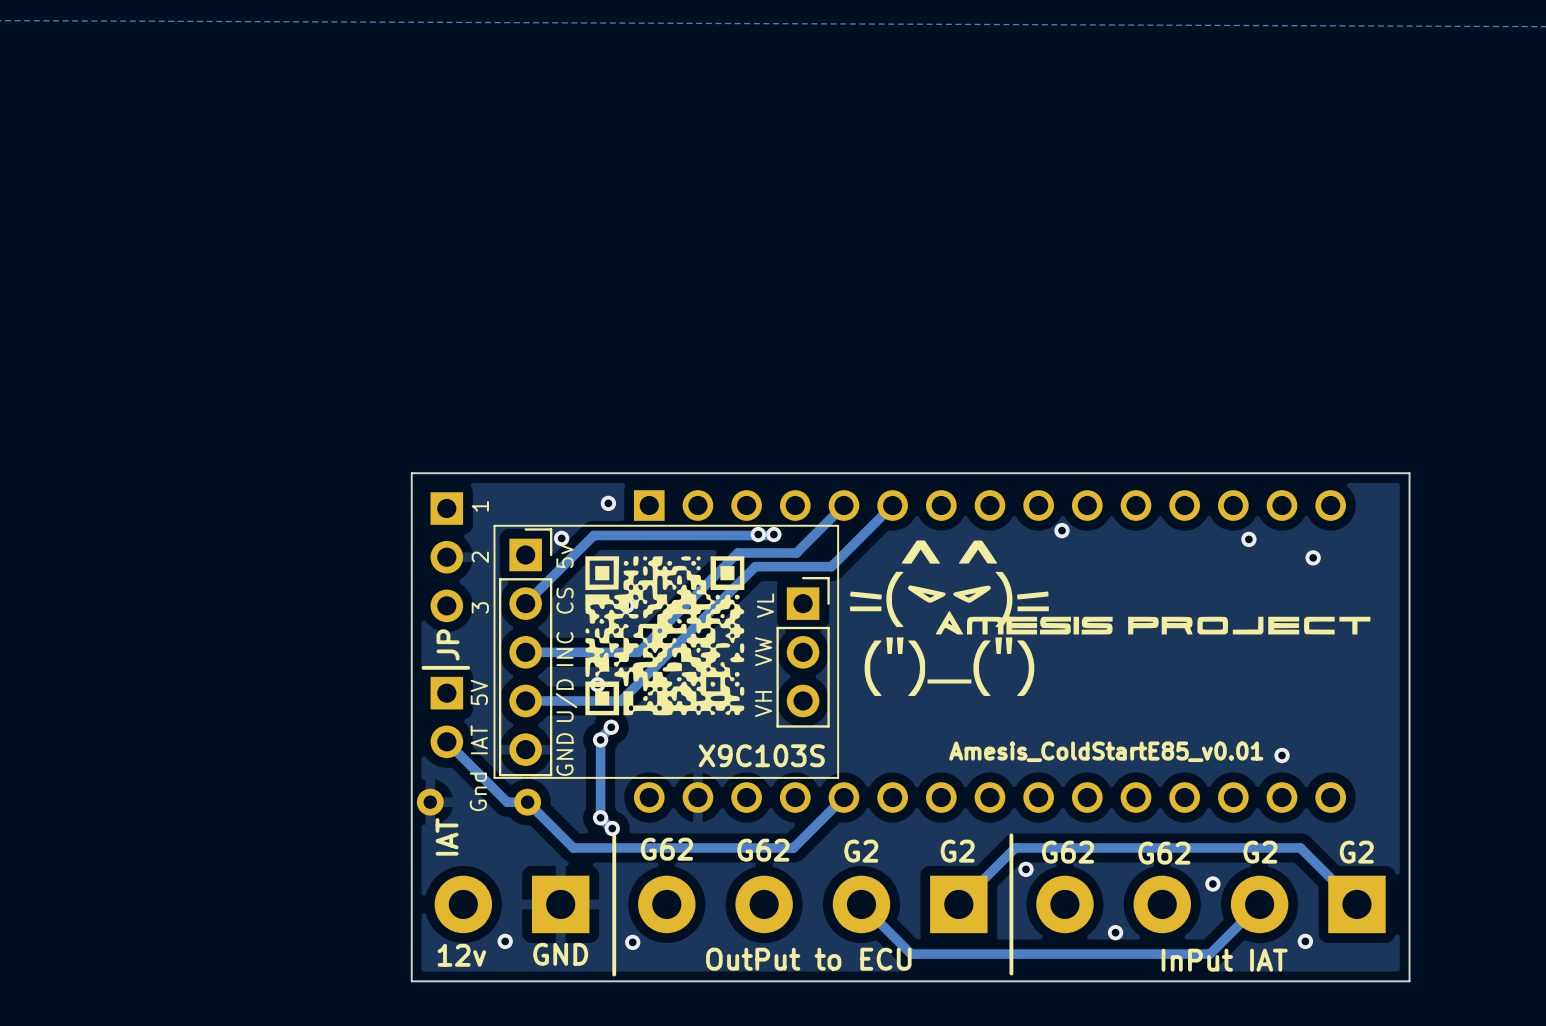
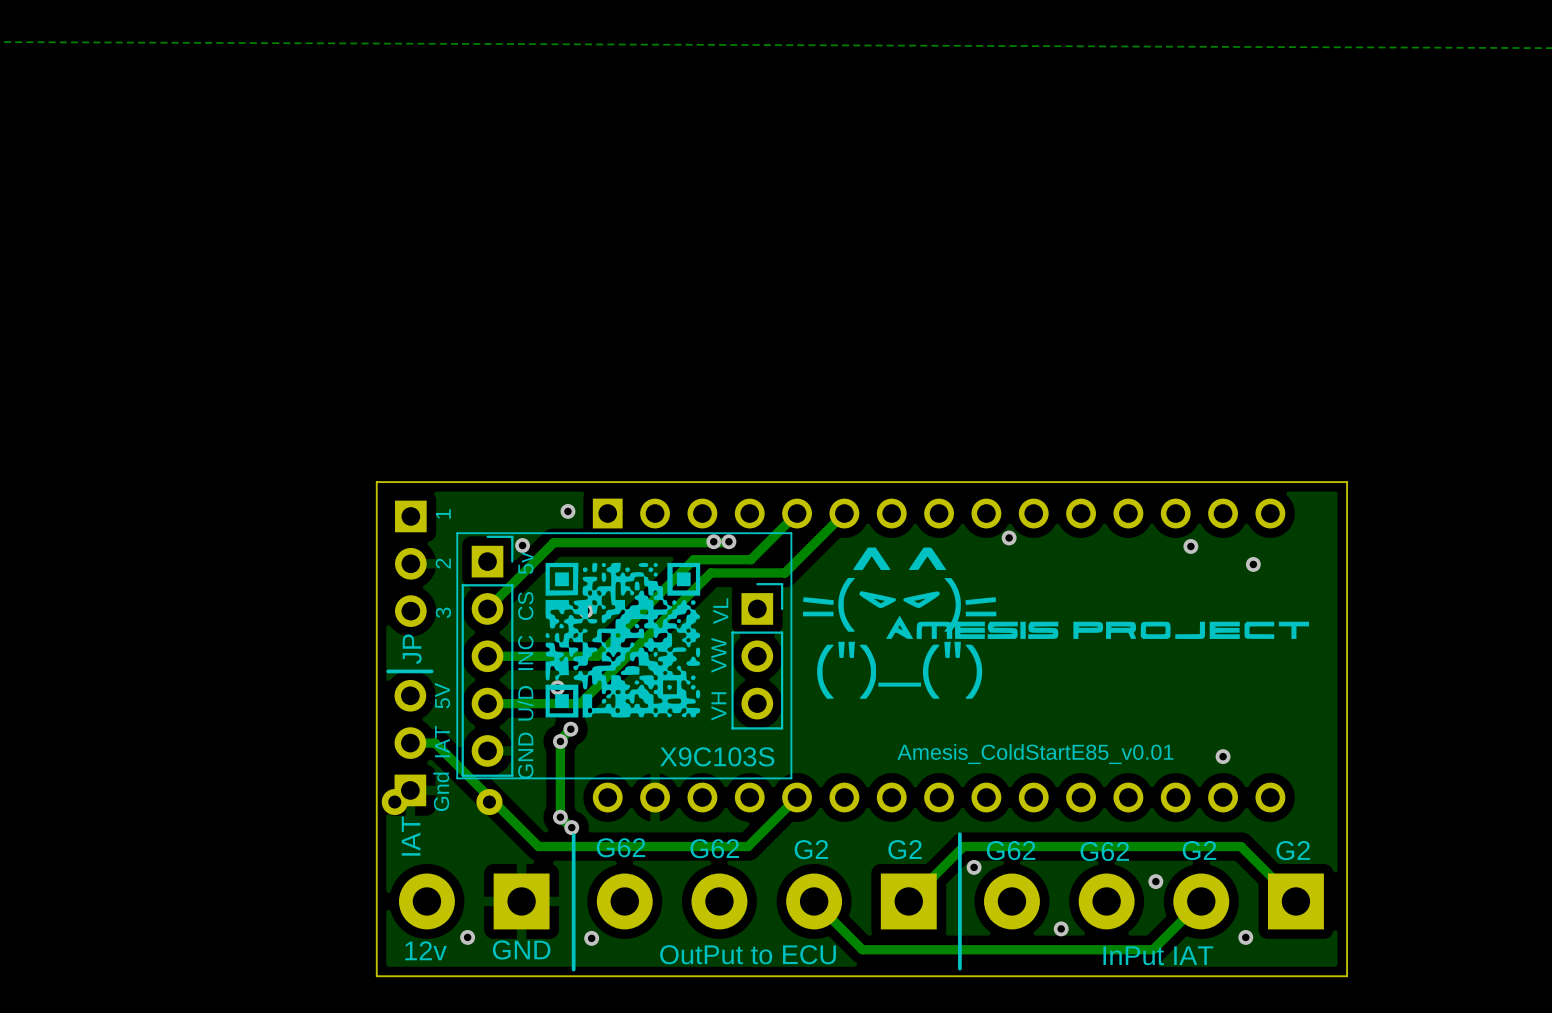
part: (446, 717) -> none
track: (446, 741) (507, 802) (527, 802) (573, 847) (578, 847) -> (410, 743) (435, 743) (538, 846)
part: none -> (410, 743)

